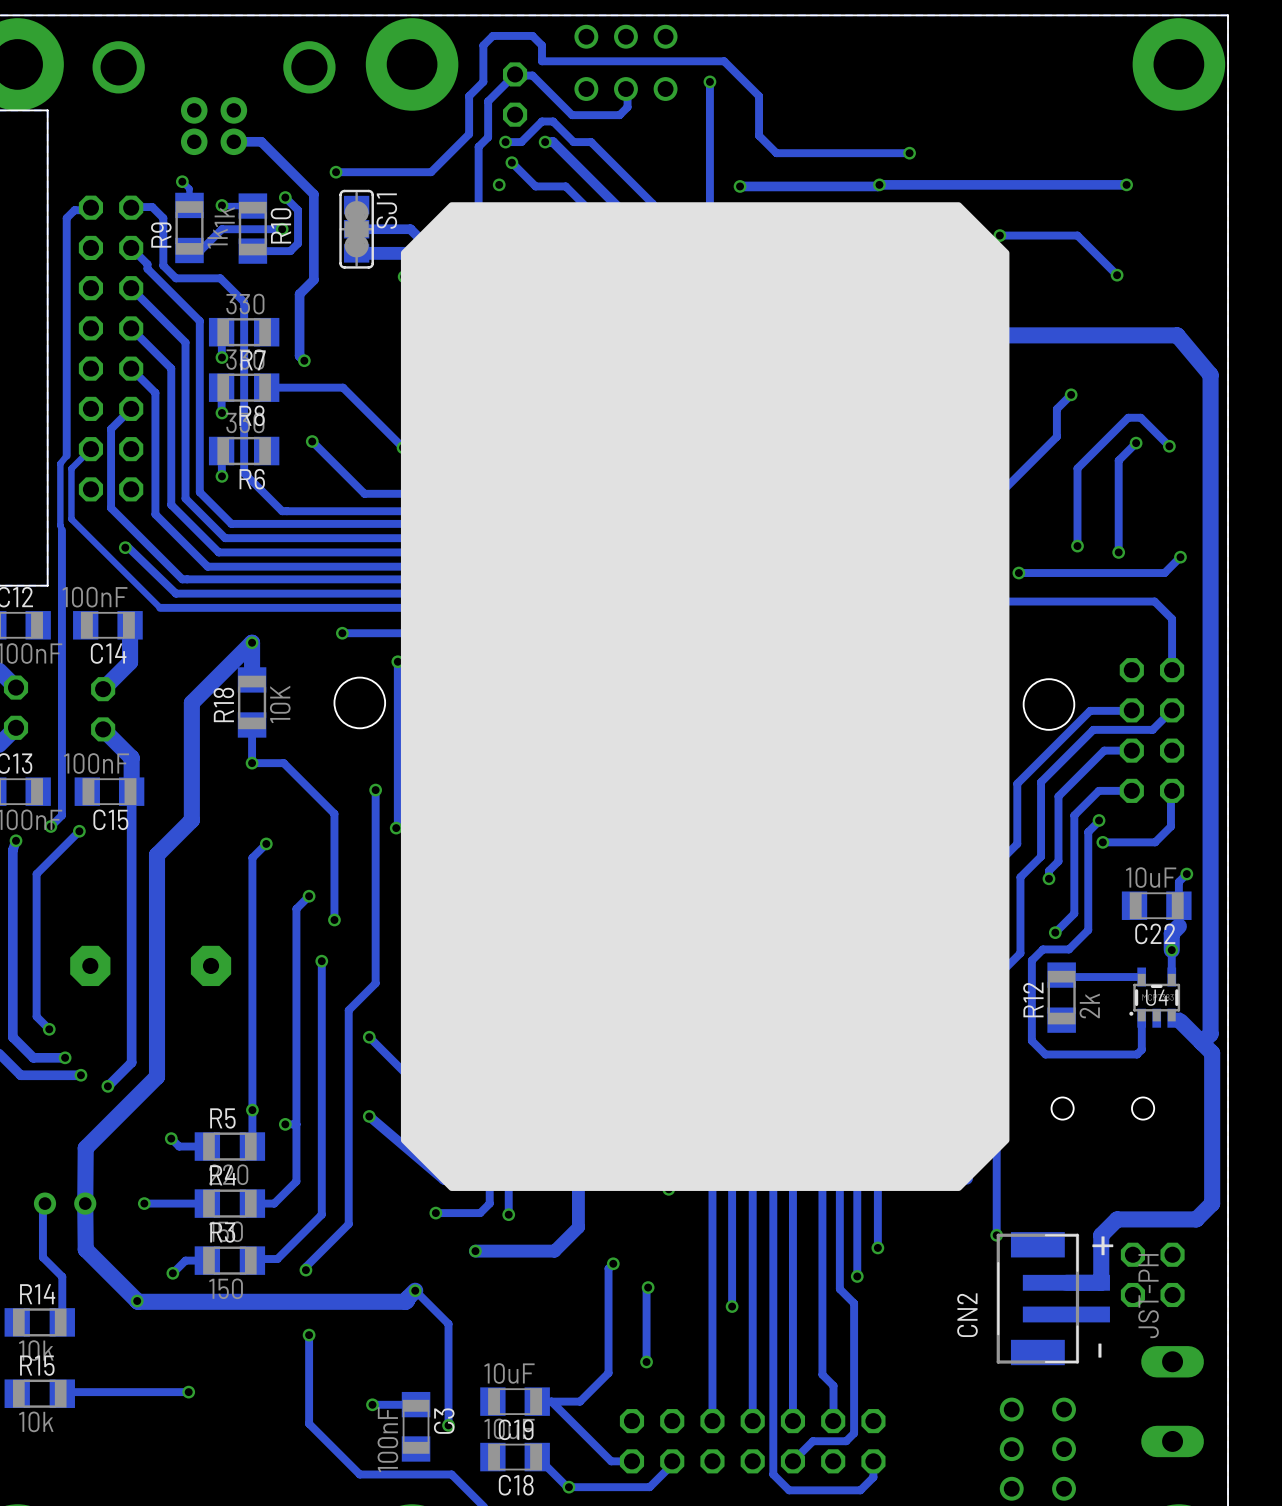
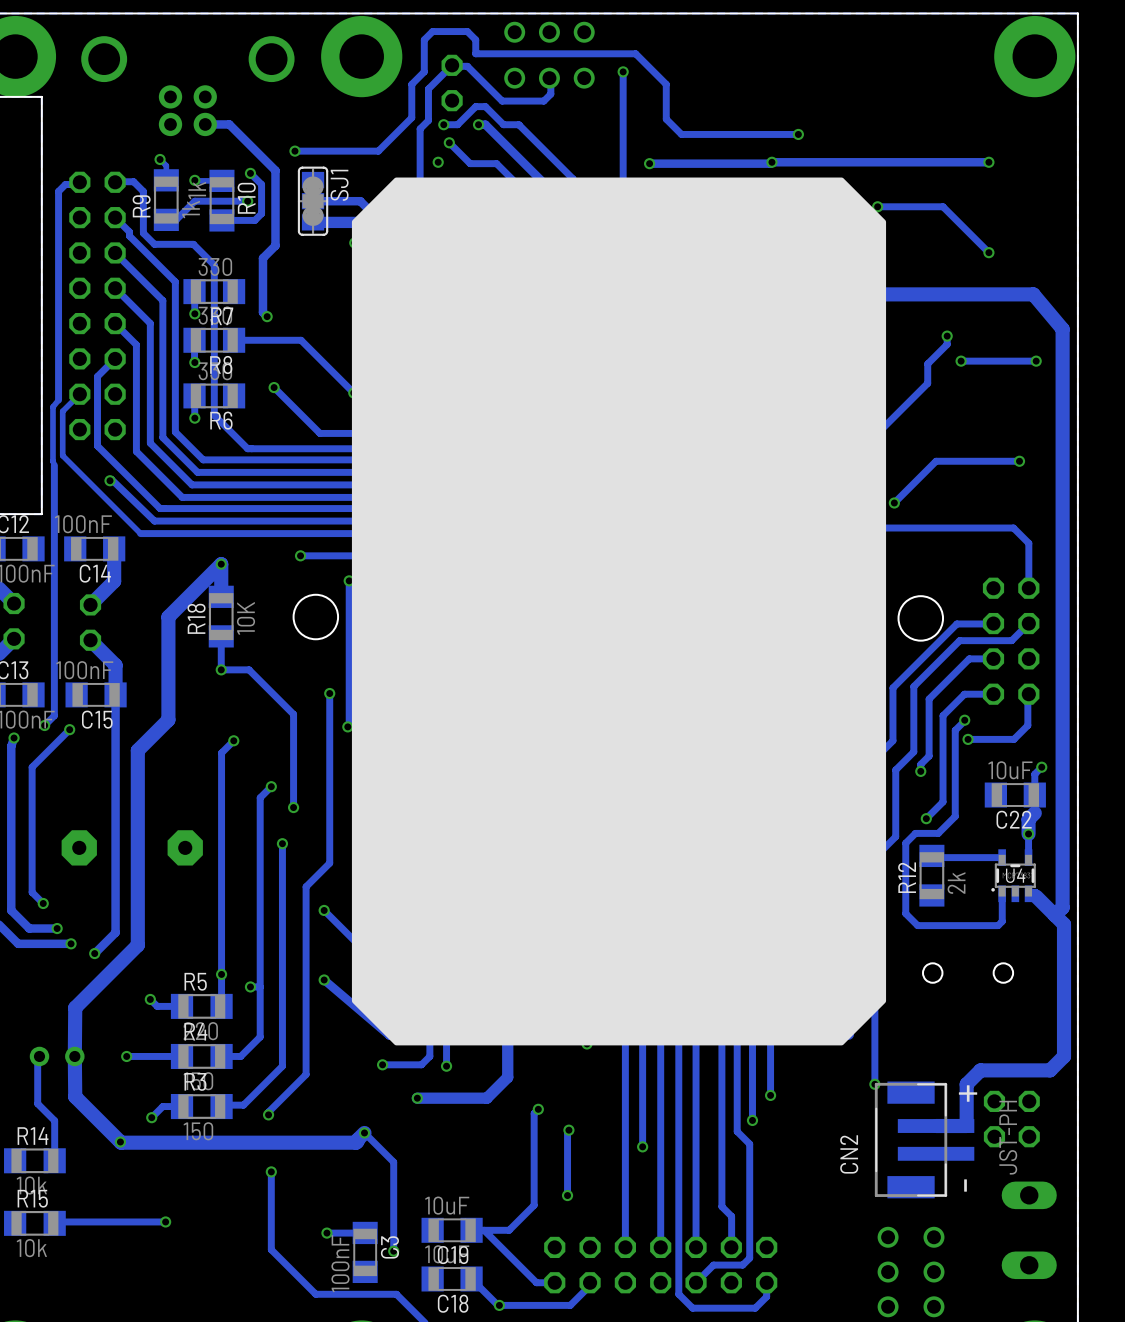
track: (1074, 235) (1077, 235) (1117, 275) -> (943, 206) (988, 252)
via position: (1117, 275) -> (988, 252)
track: (1071, 394) (1056, 409) (1056, 414) -> (947, 336) (947, 344) (927, 363)
via position: (1071, 394) -> (947, 336)
via: none -> (961, 361)
track: none -> (1036, 361) (961, 361)
via: none -> (1036, 361)
track: (1136, 443) (1118, 460) (1118, 552) -> none
via: (1136, 443) -> none
track: (1169, 446) (1140, 417) (1128, 417) (1077, 468) (1077, 546) -> none
via: (1169, 446) -> none
via: none -> (1019, 461)
via: (1077, 546) -> none
via: (1118, 552) -> none
track: (1180, 557) (1164, 573) (1018, 573) -> (1019, 461) (936, 461) (894, 502)
via: (1180, 557) -> none

